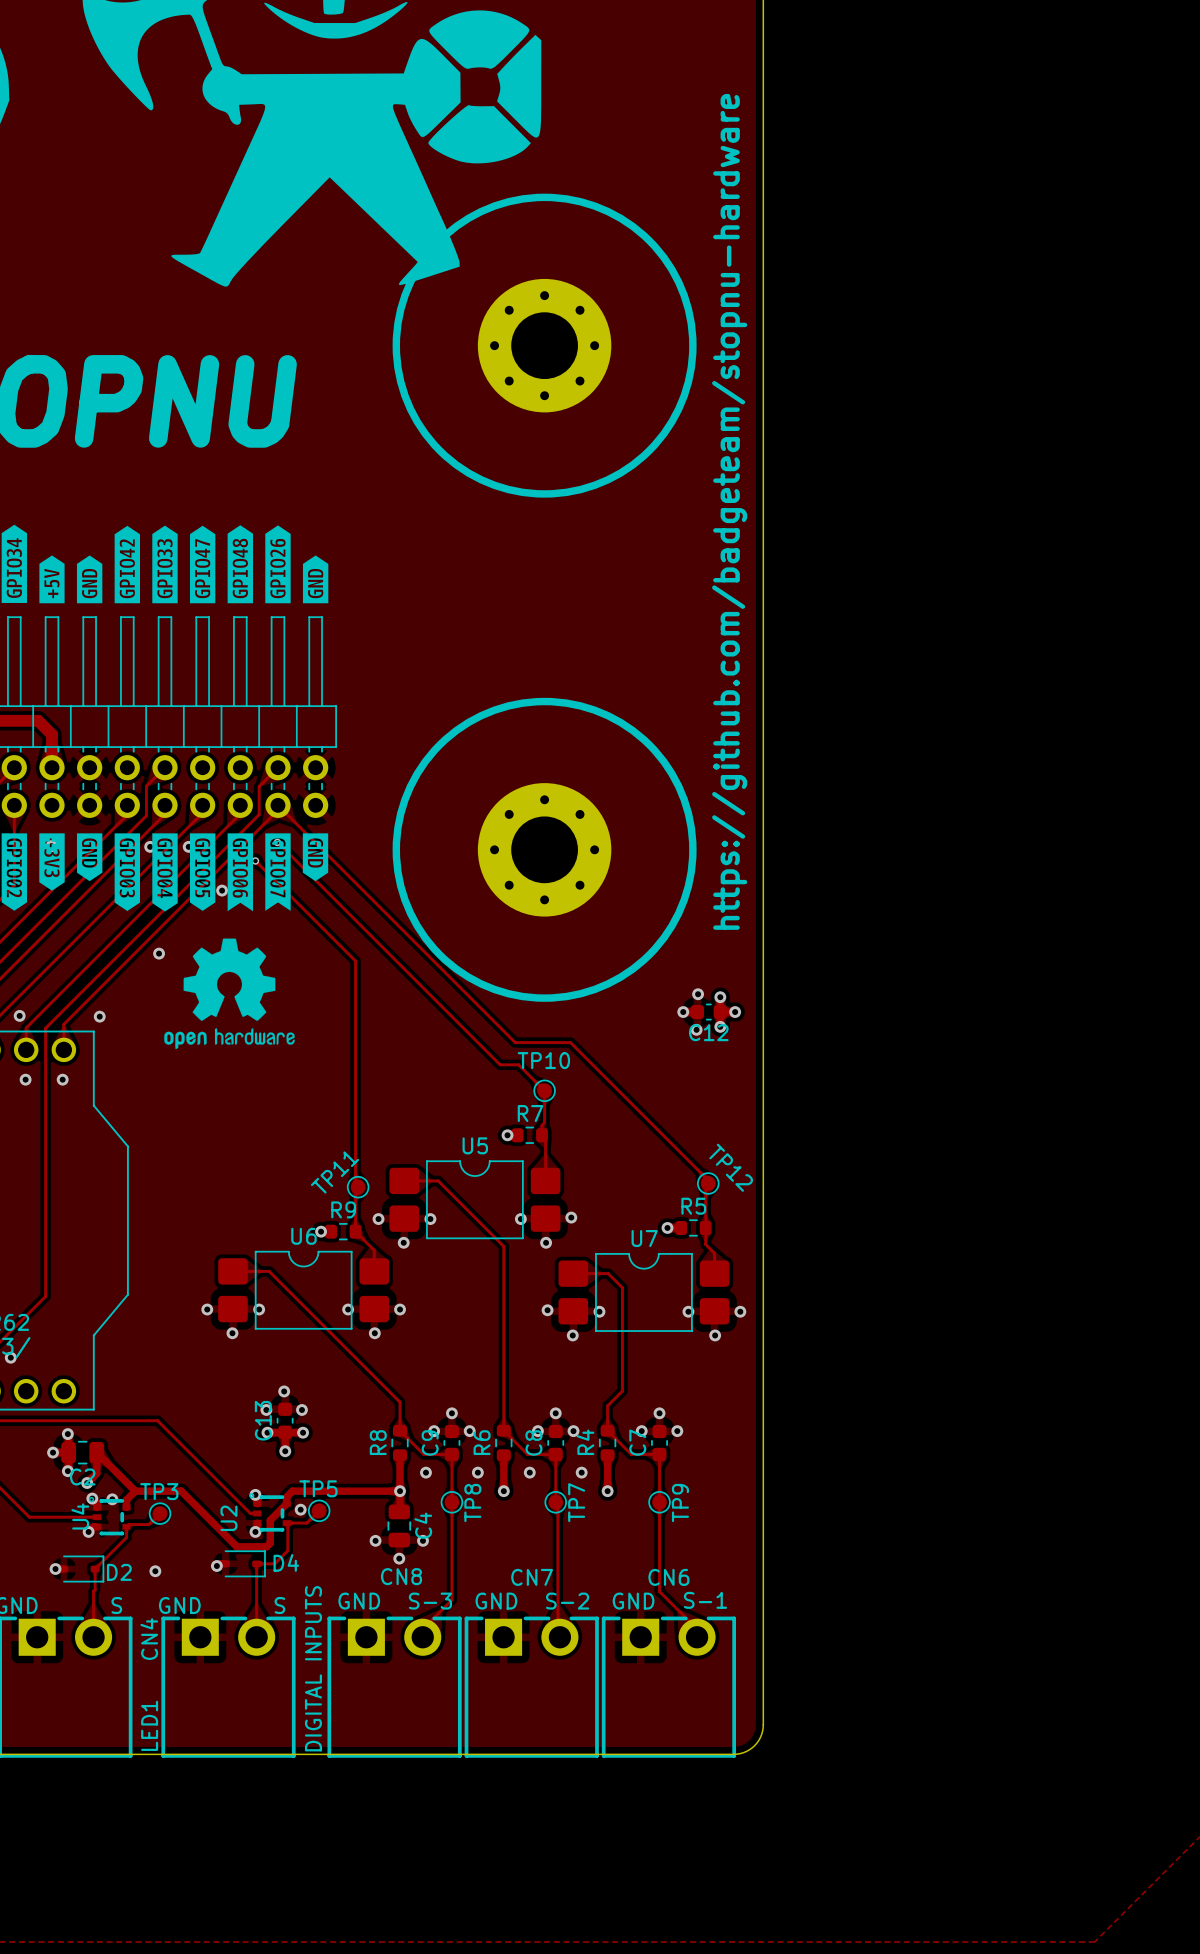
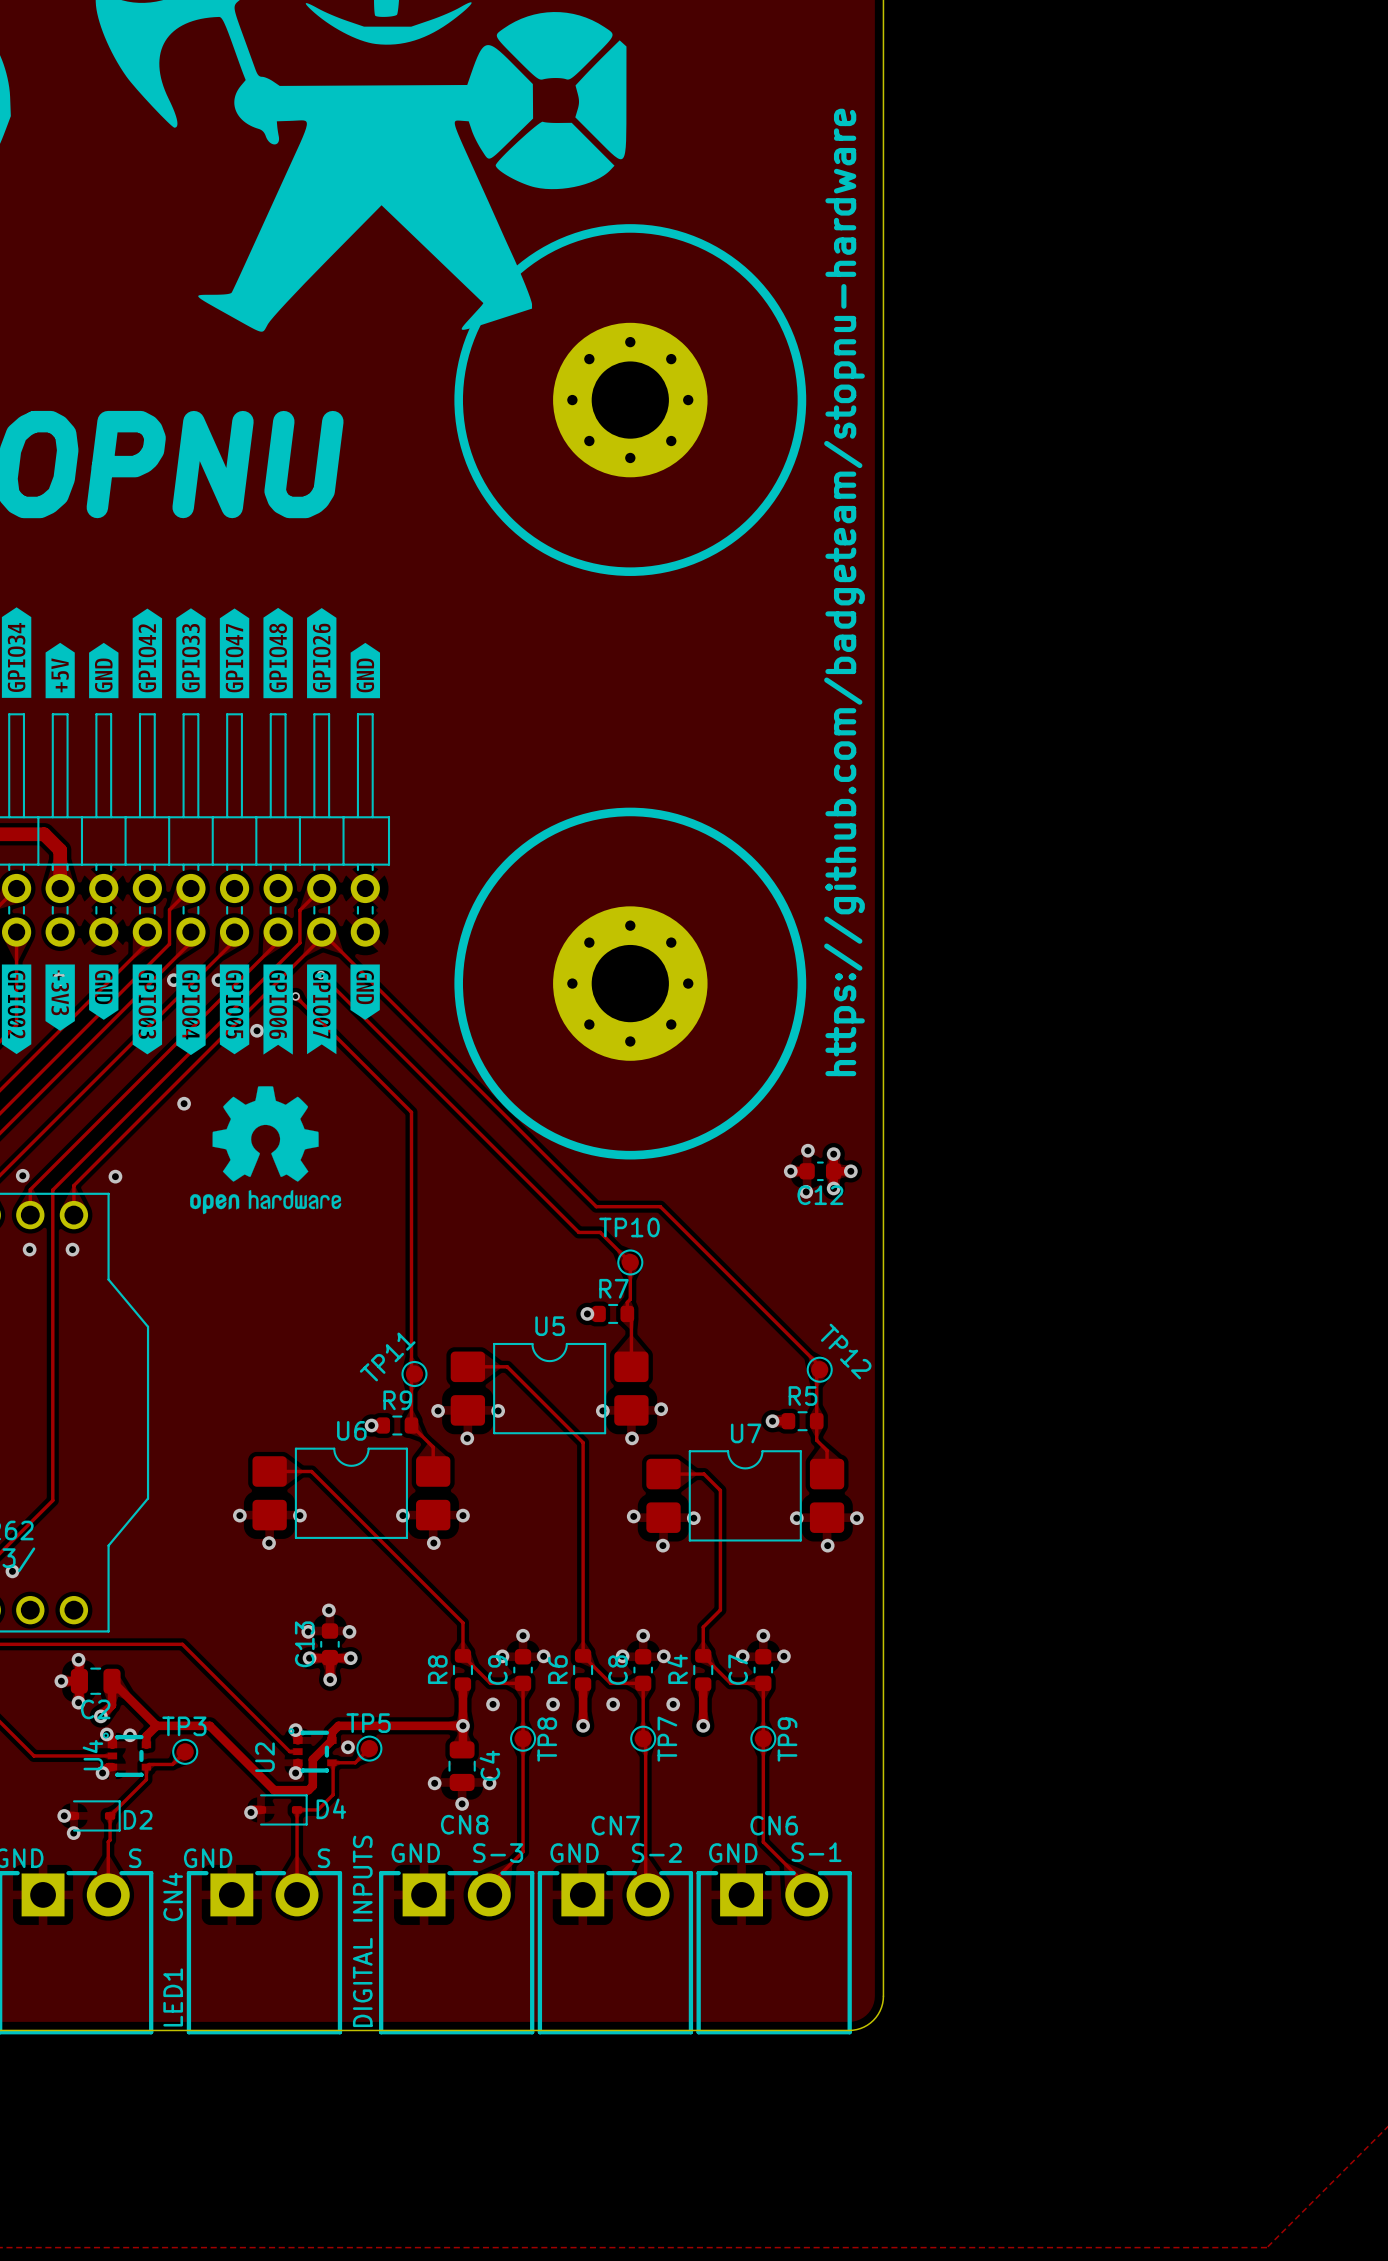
via: (155, 1571) -> none
via: none -> (73, 1833)

